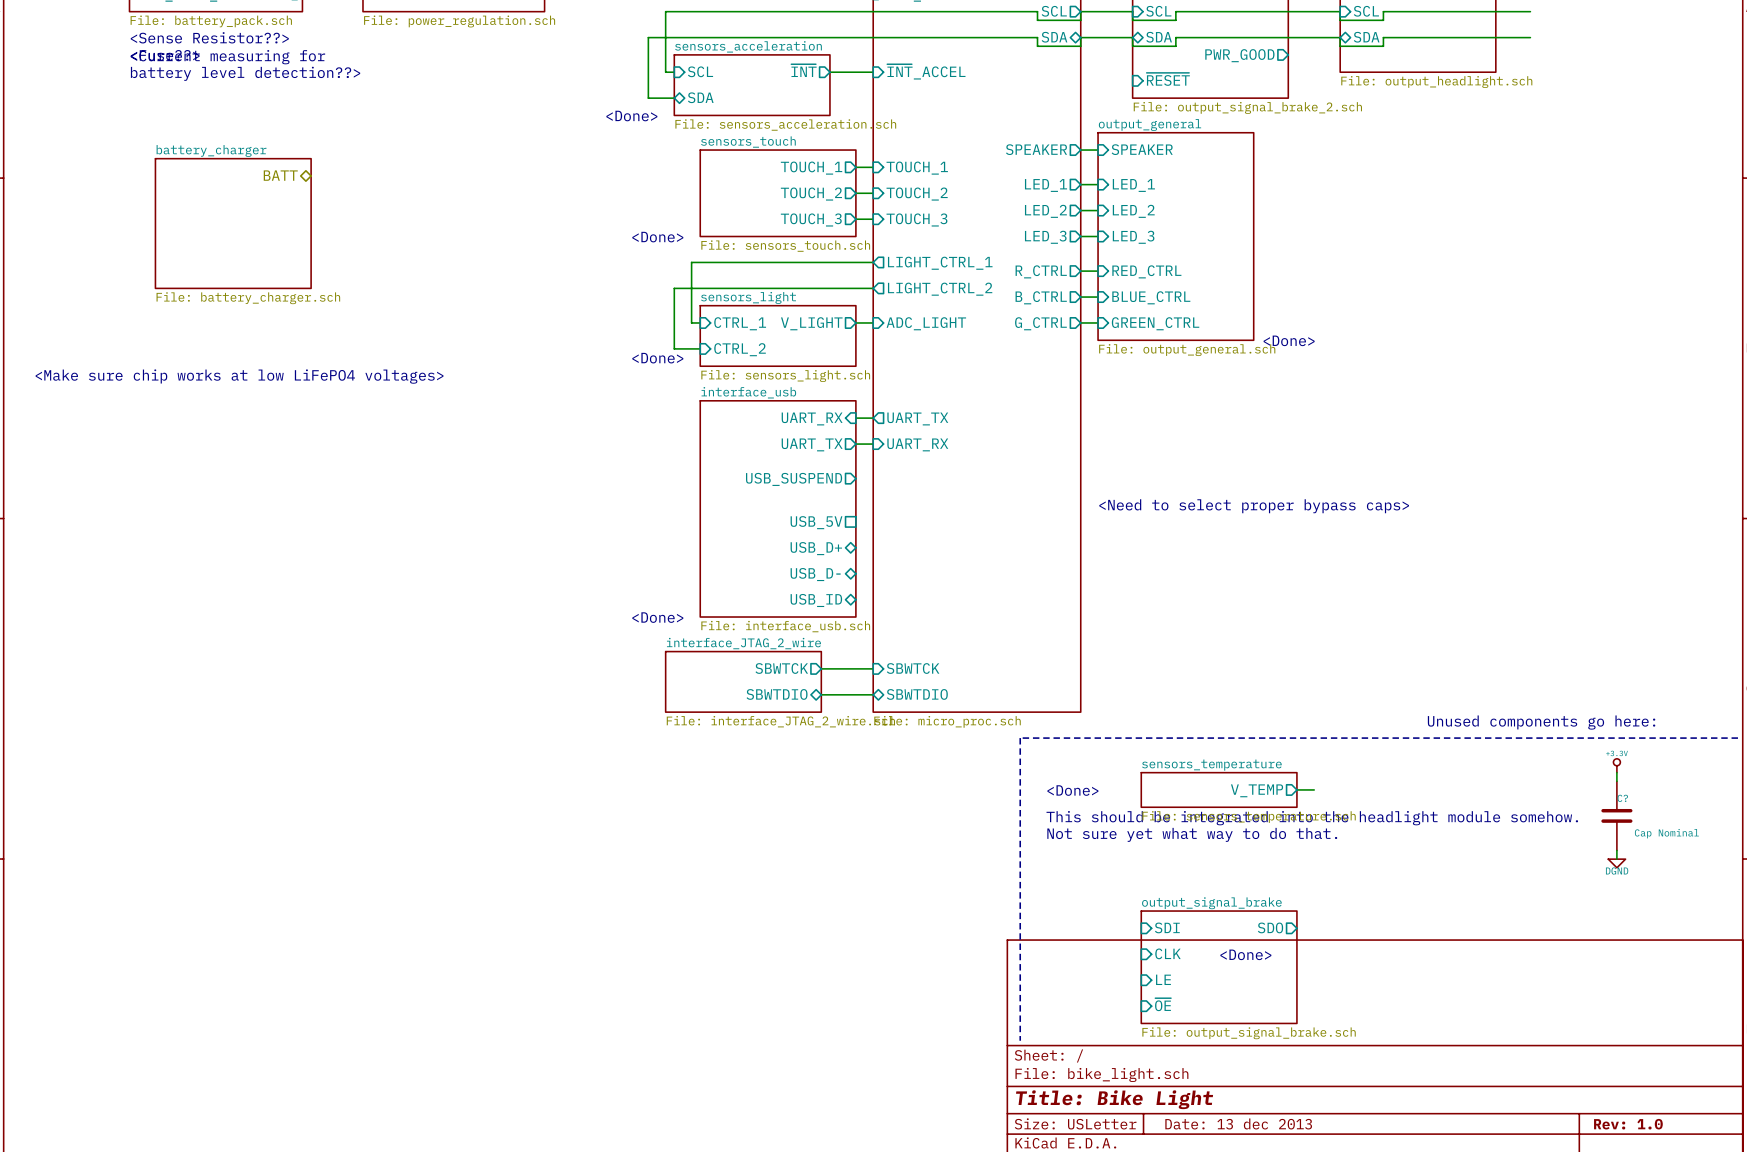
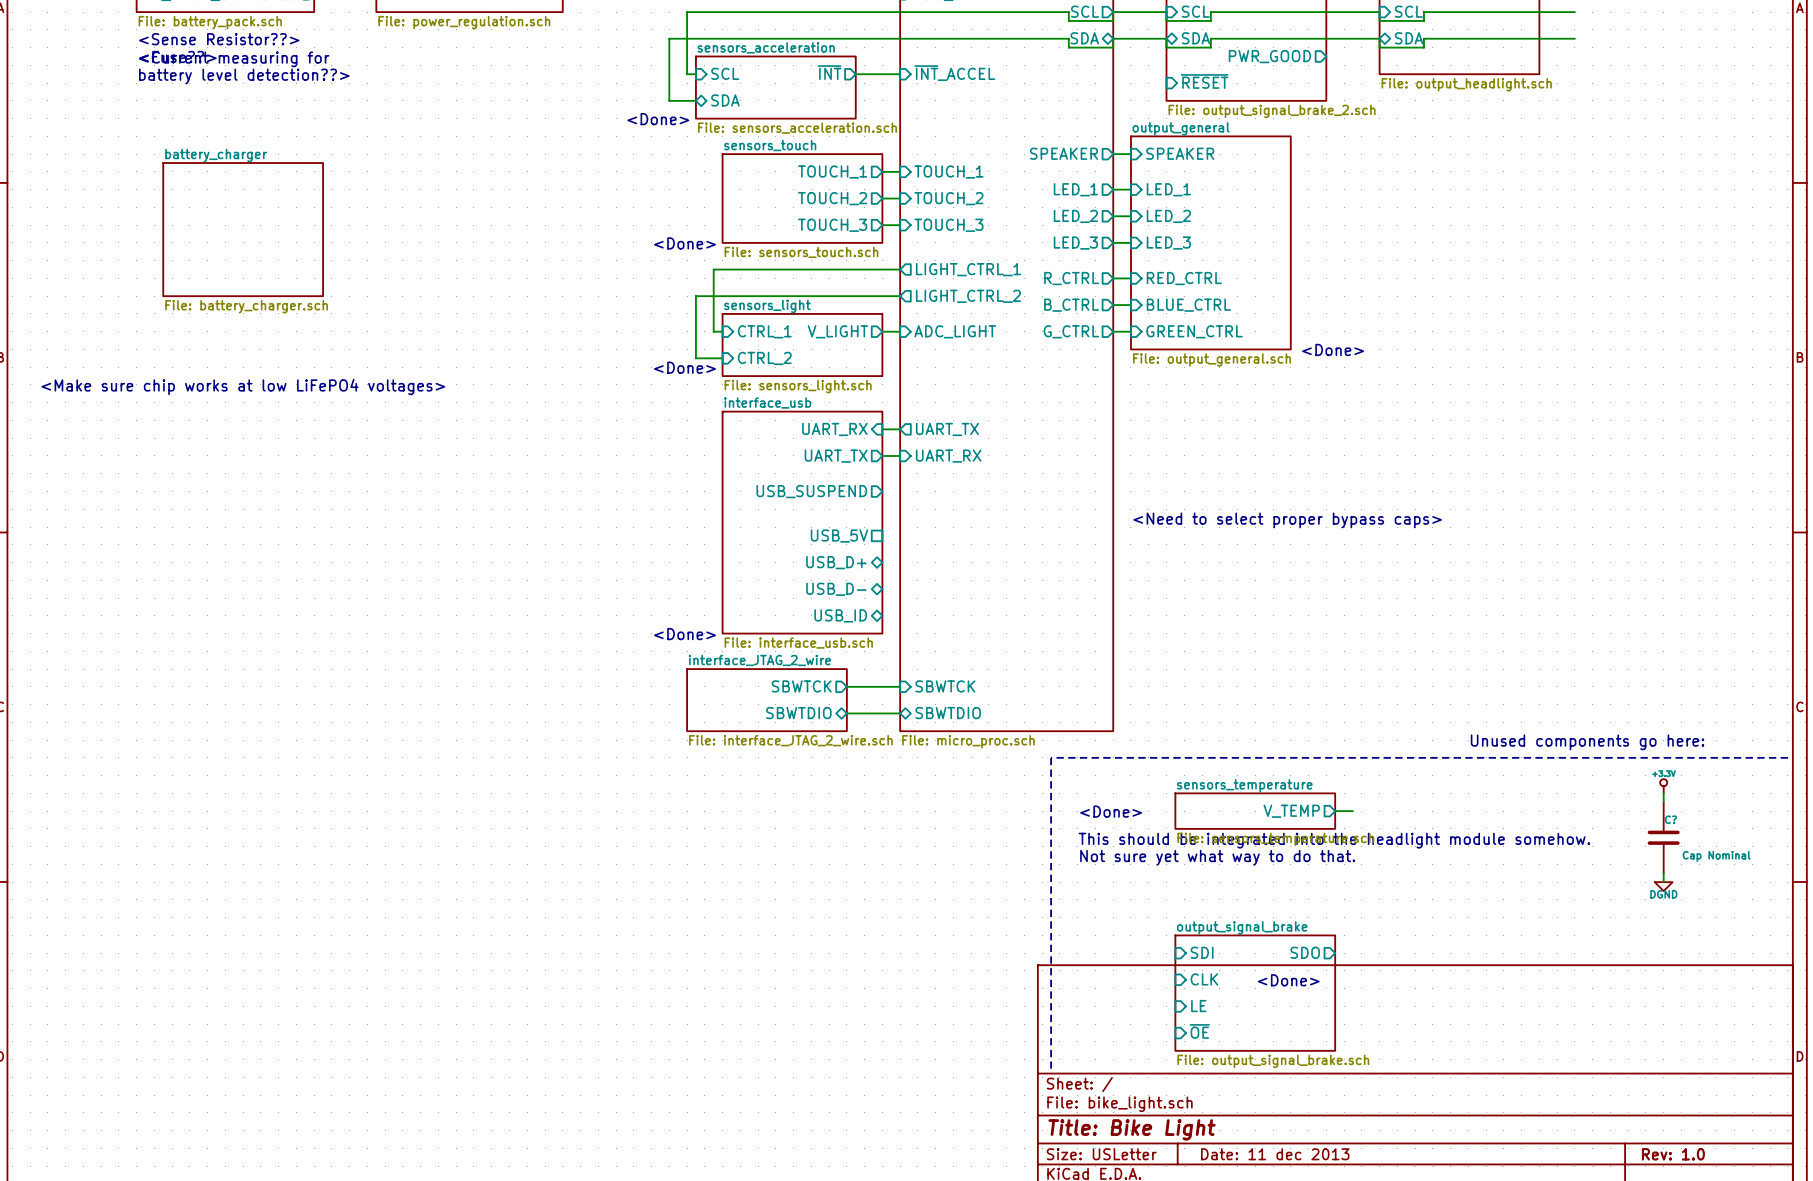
hierarchical label: BATT (280, 175) -> none
title block: Date: 13 dec 2013 (1238, 1123) -> Date: 11 dec 2013 (1275, 1154)

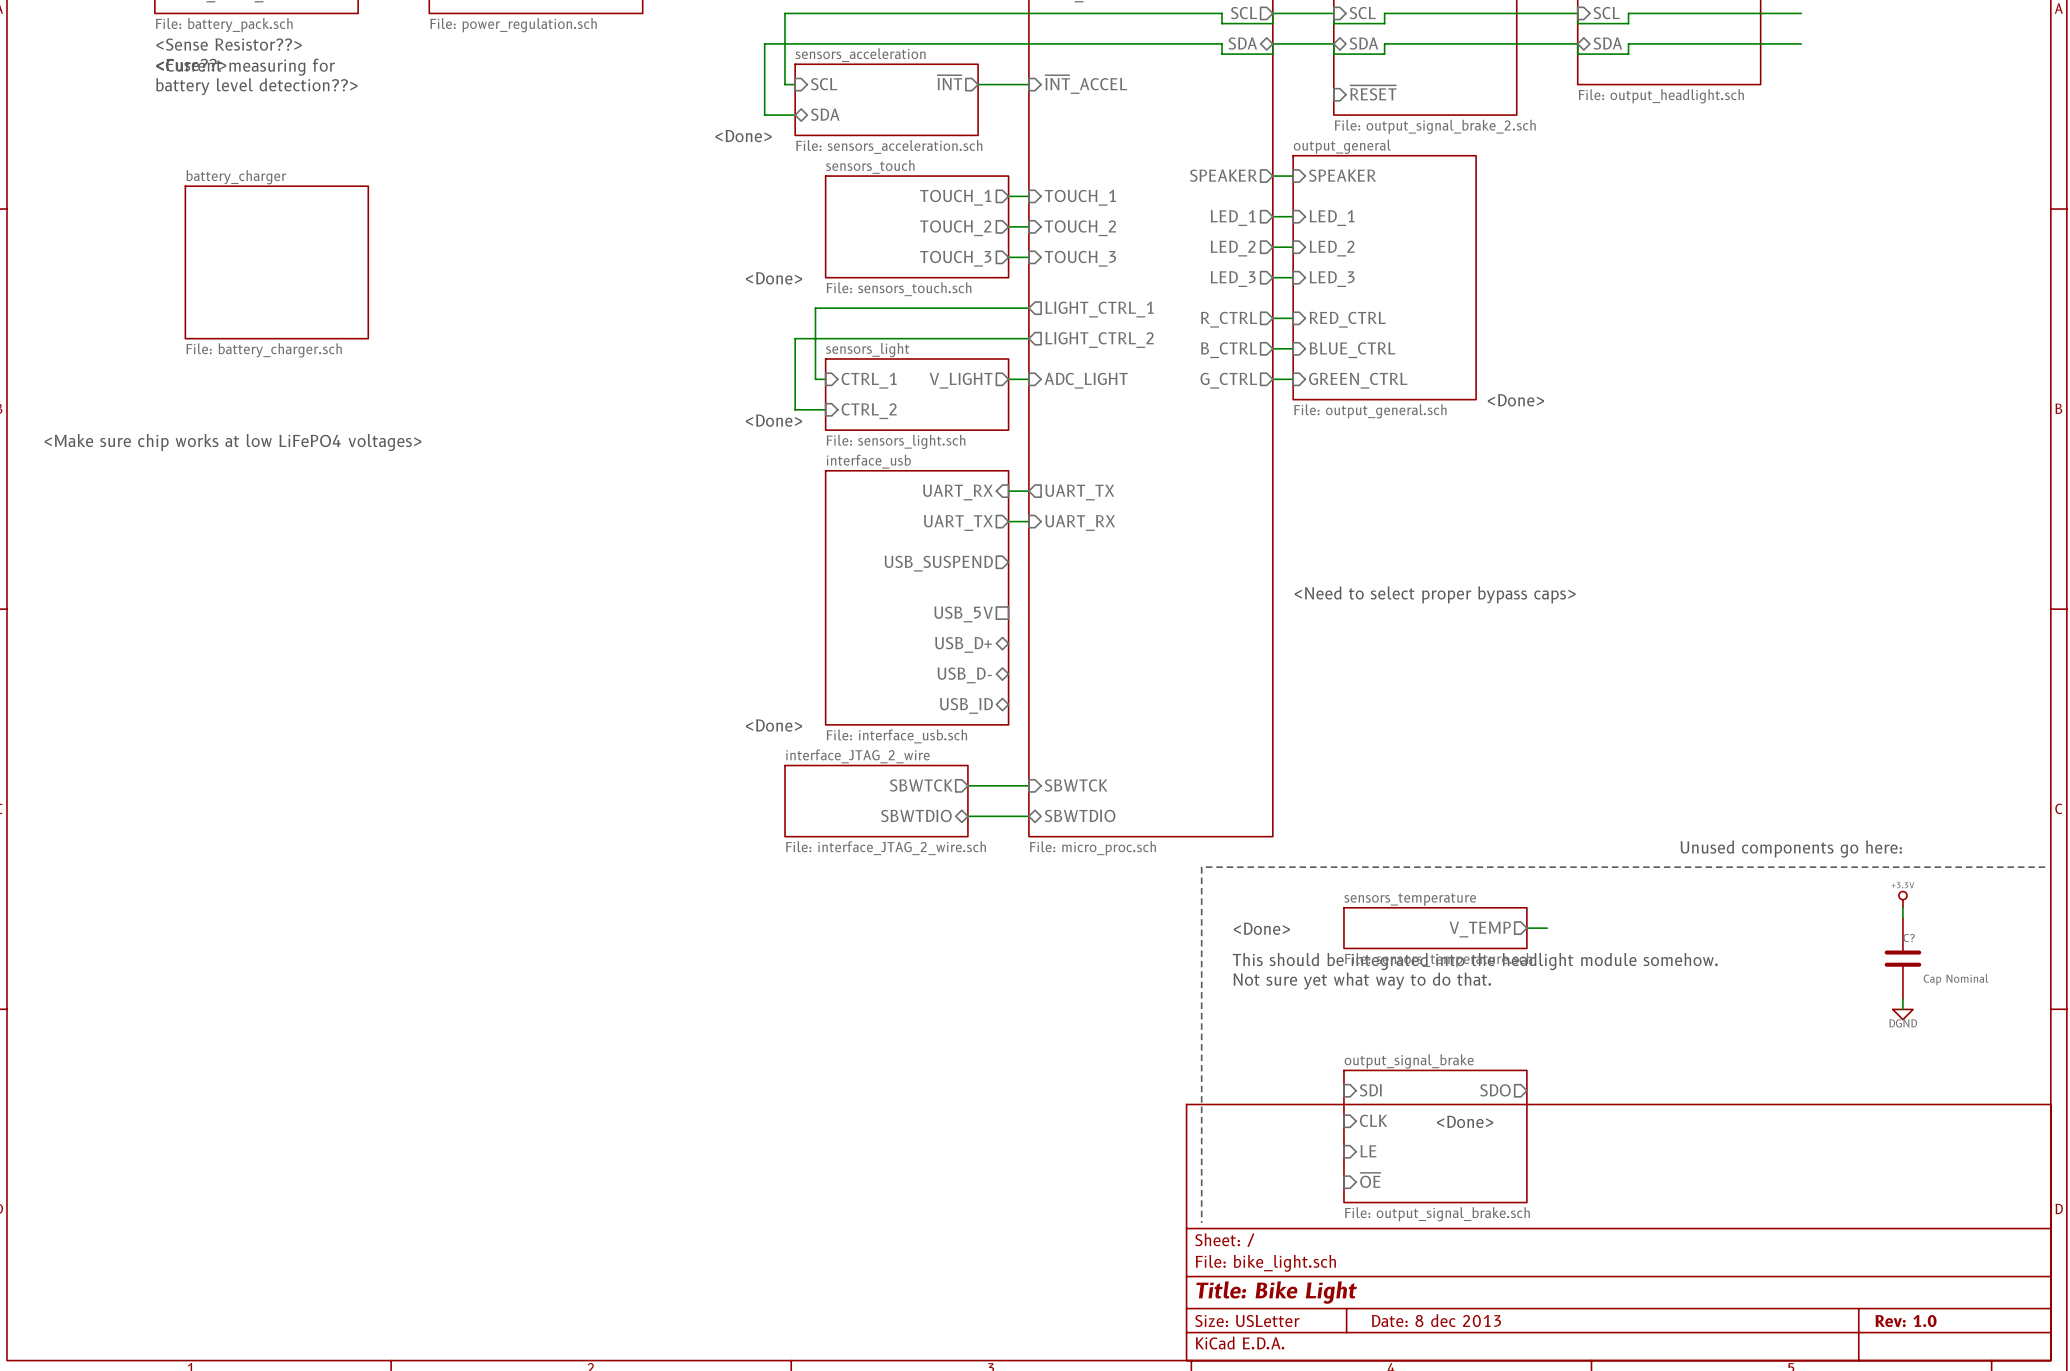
sheet pin: PWR_GOOD (1269, 56) -> none
title block: Date: 11 dec 2013 (1275, 1154) -> Date: 8 dec 2013 (1436, 1320)

